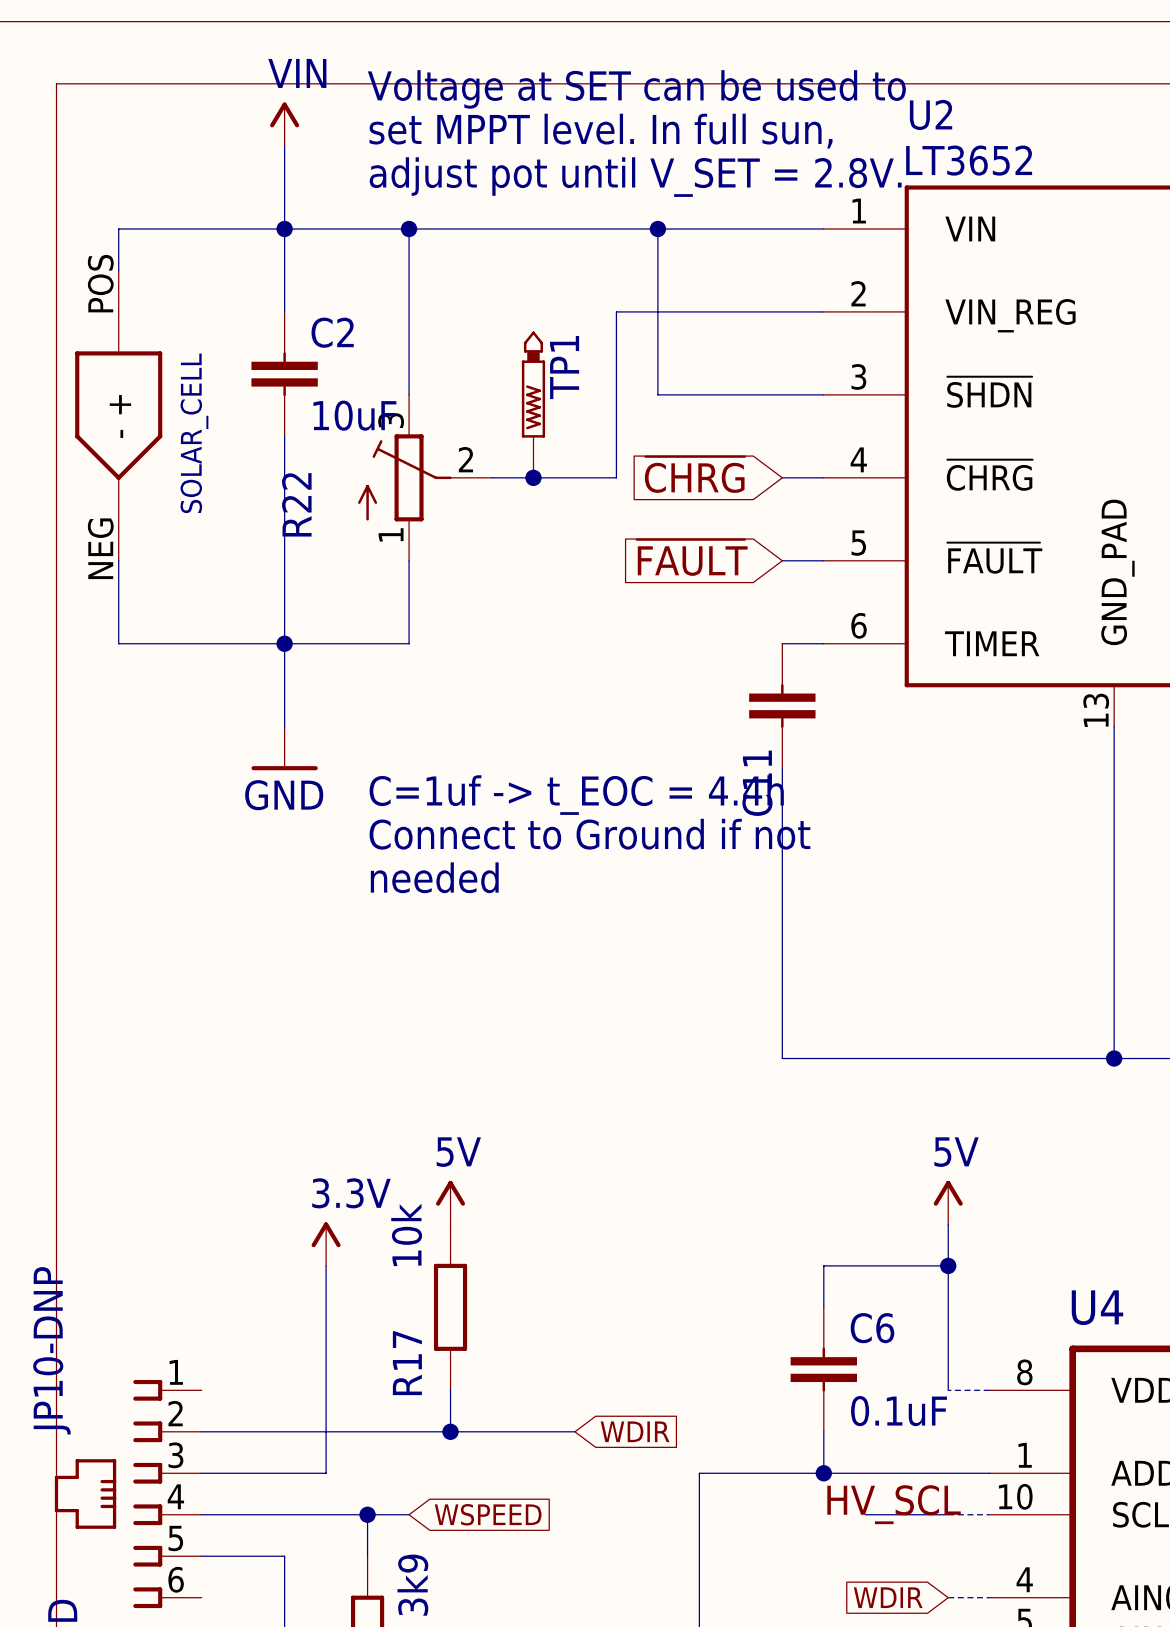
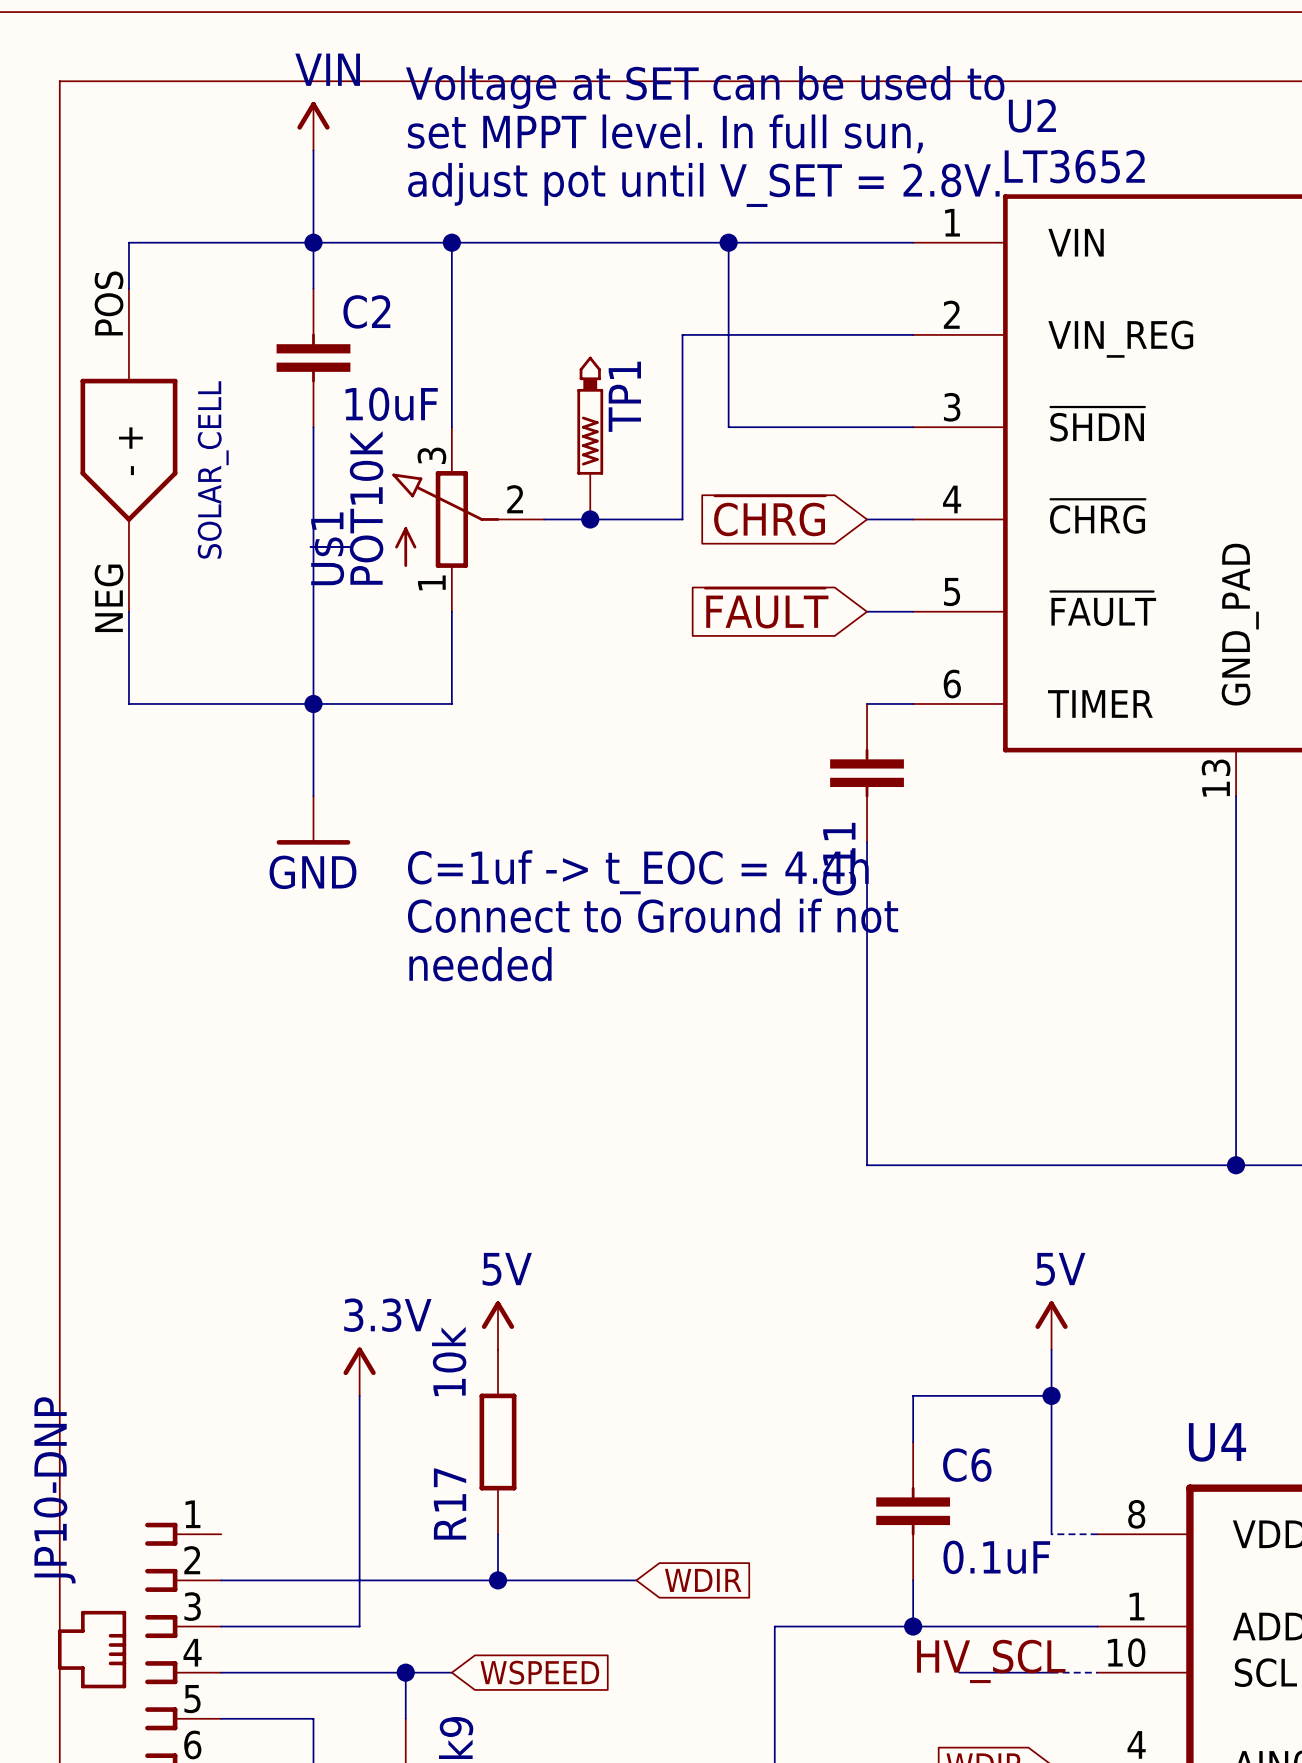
C2 position: (284, 374) -> (313, 358)
U$1: none -> POT10K (468, 519)
R22: (425, 477) -> none

